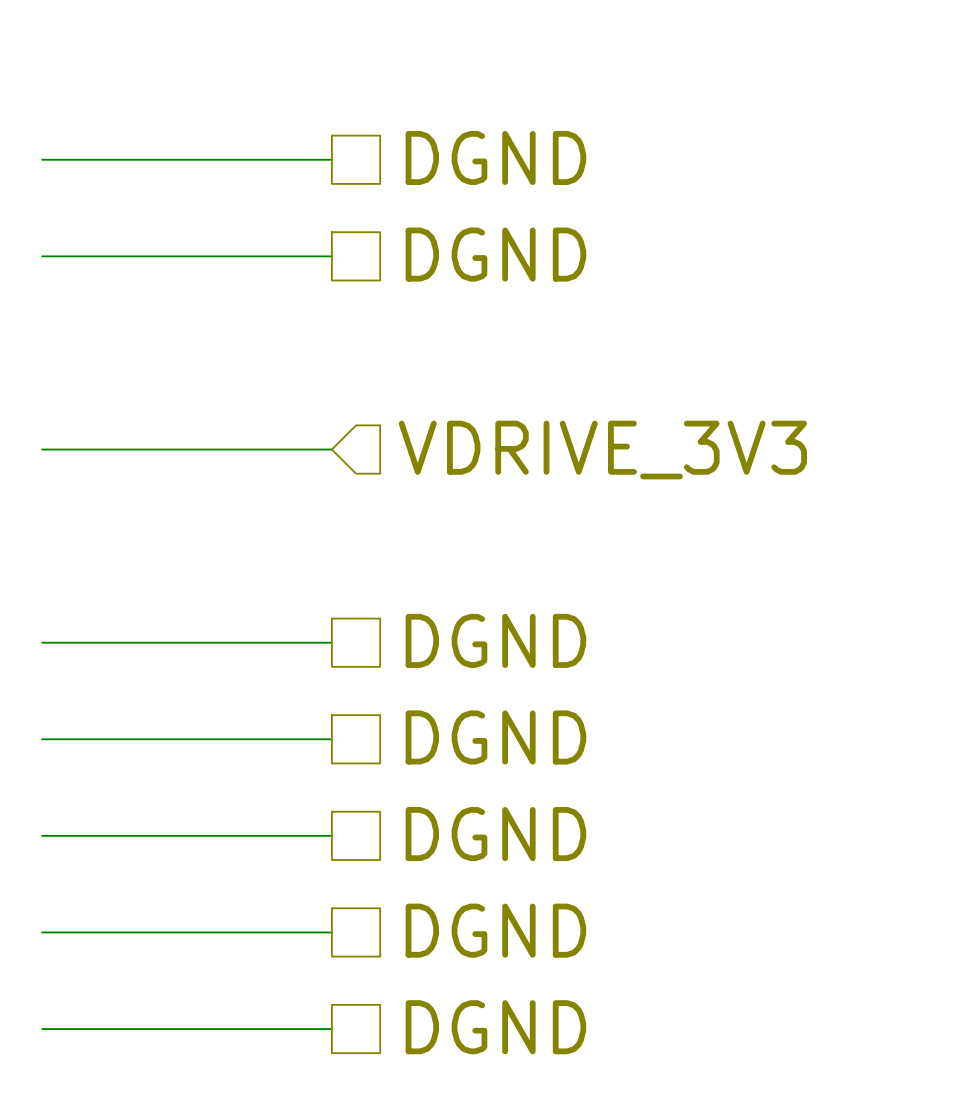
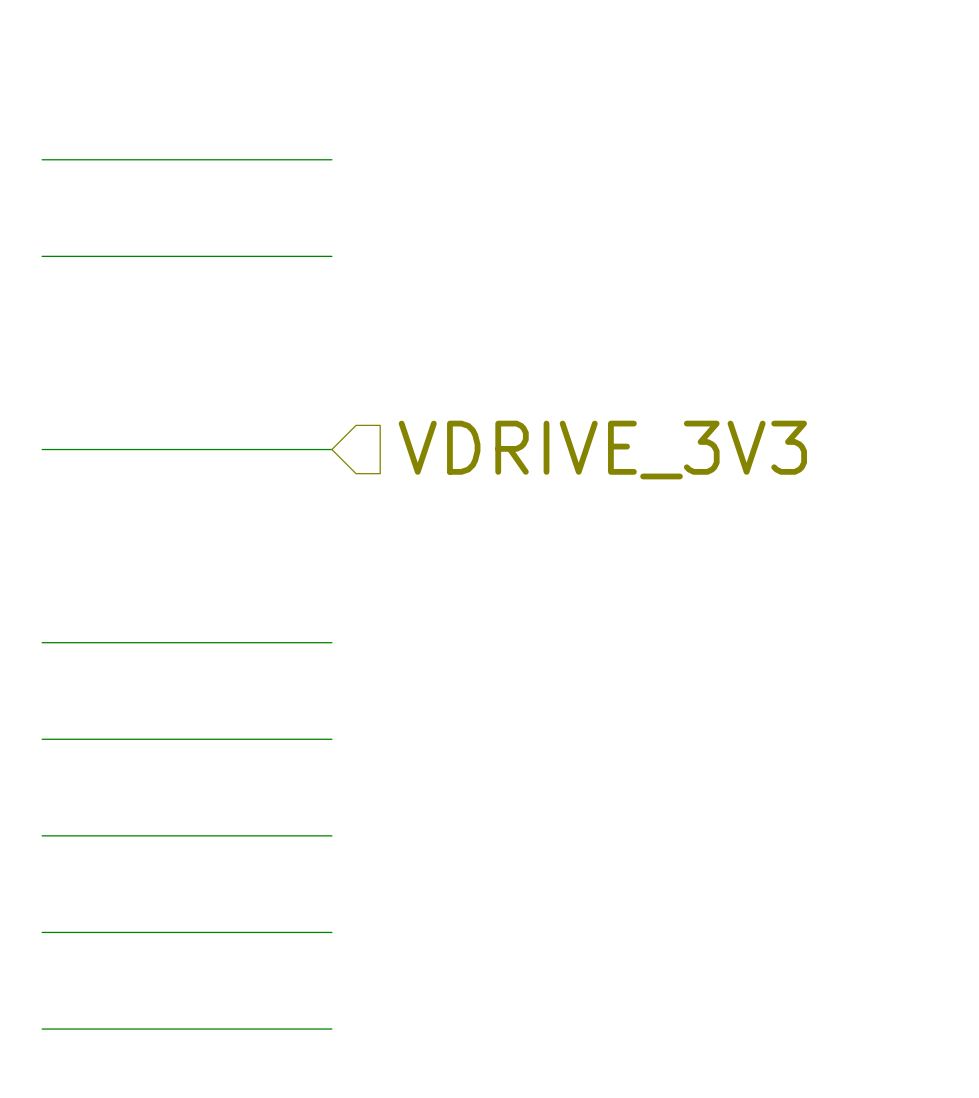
hierarchical label: DGND (495, 157) -> none
hierarchical label: DGND (495, 254) -> none
hierarchical label: DGND (495, 640) -> none
hierarchical label: DGND (495, 737) -> none
hierarchical label: DGND (495, 834) -> none
hierarchical label: DGND (495, 930) -> none
hierarchical label: DGND (495, 1027) -> none

